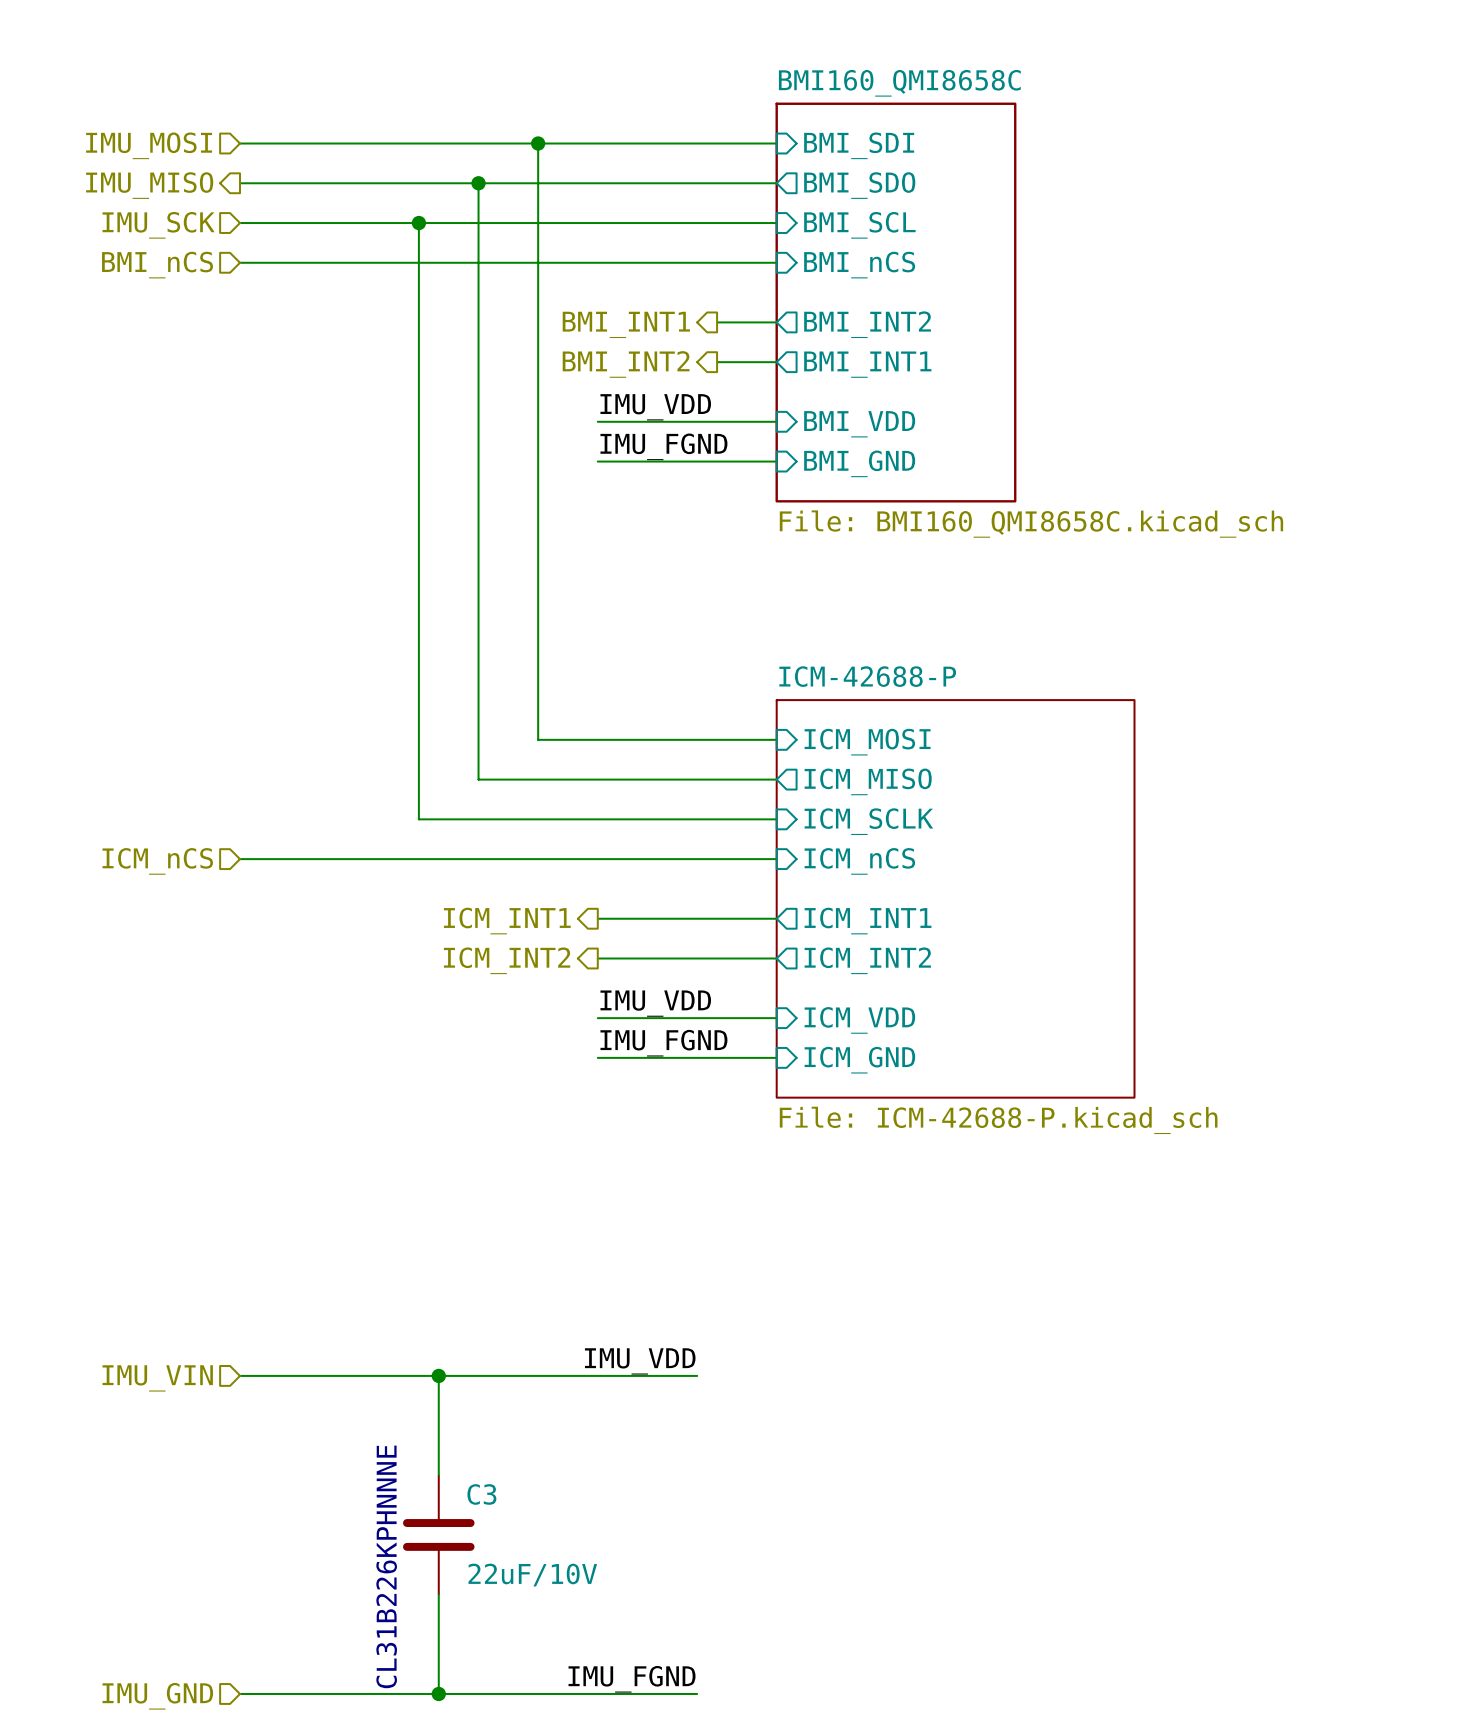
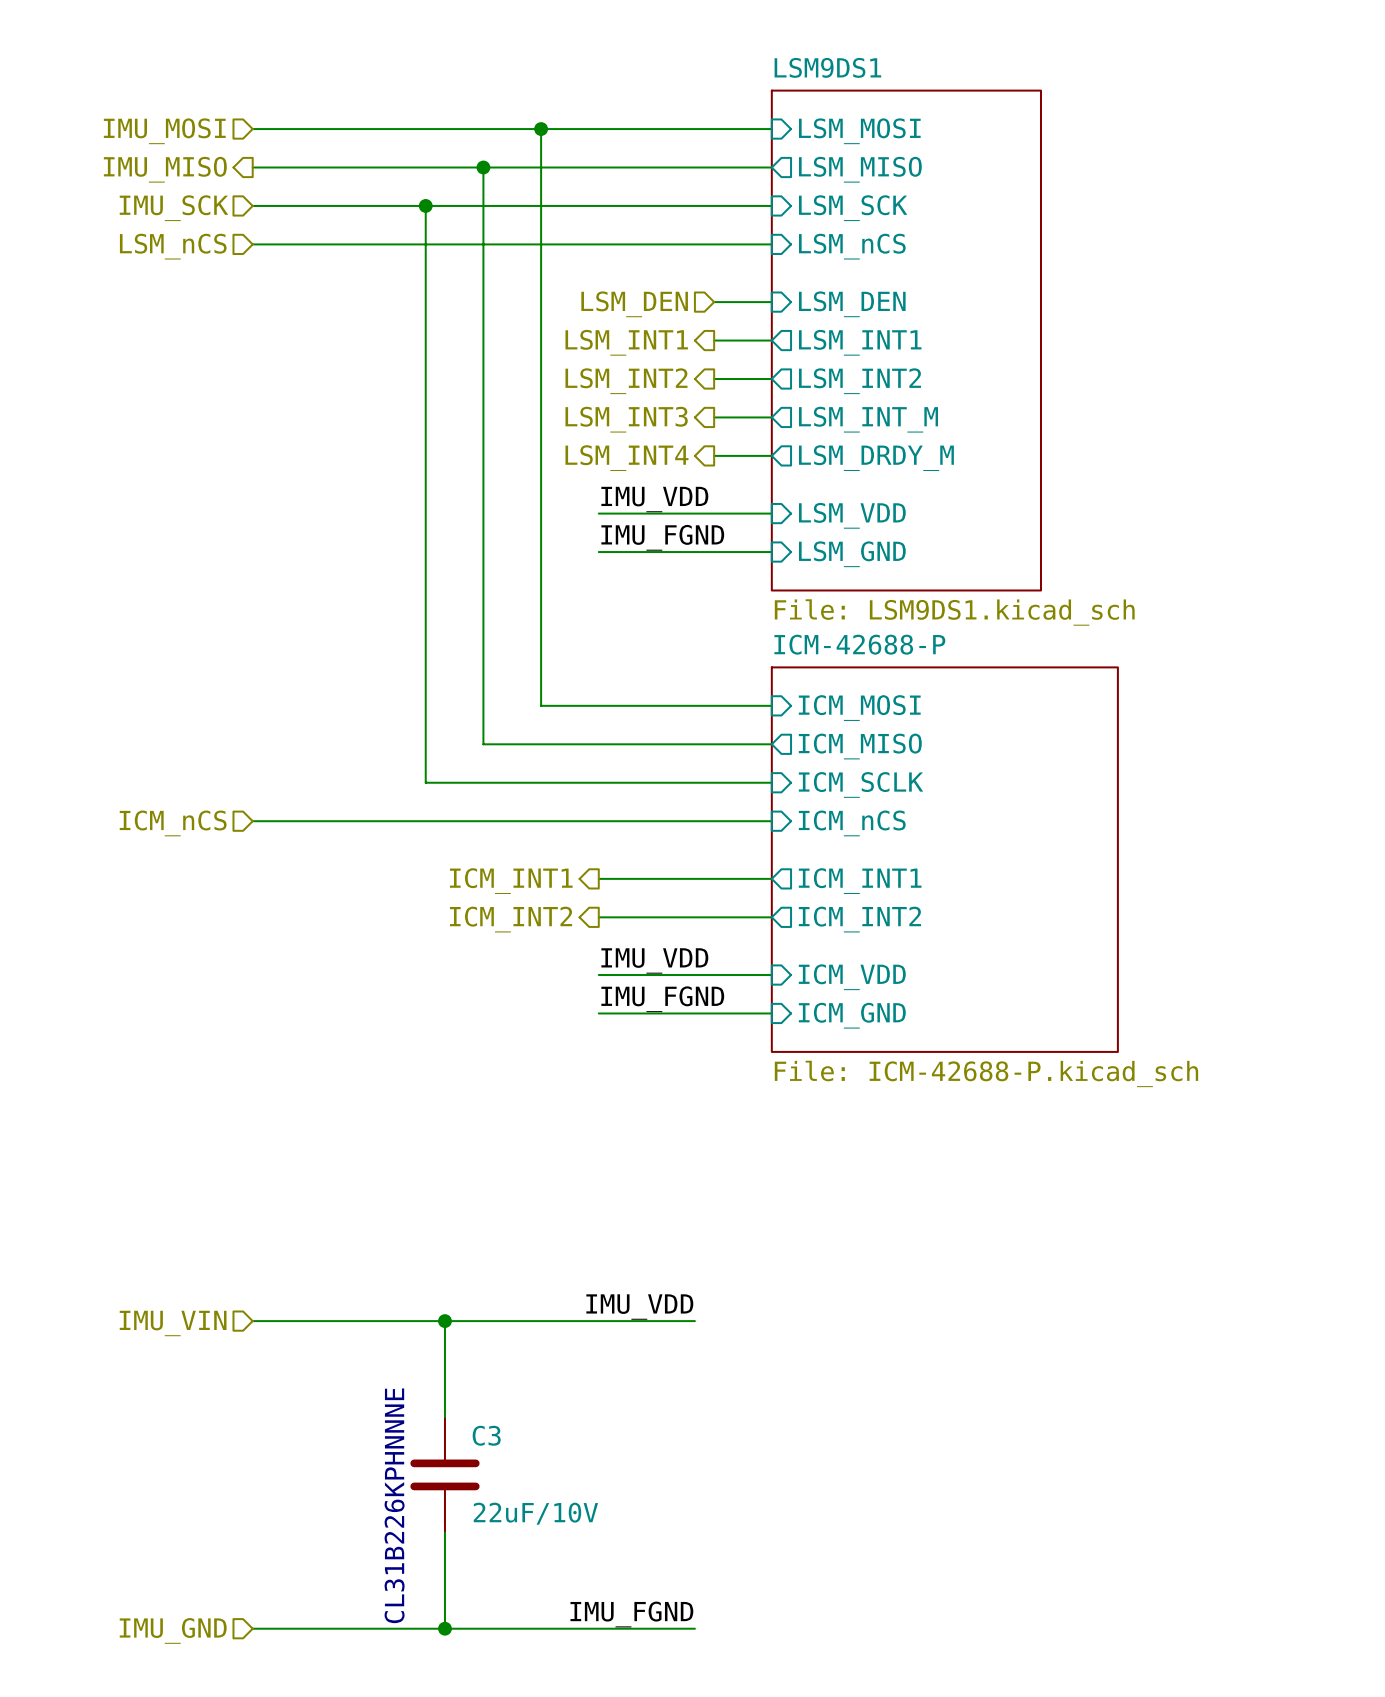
sheet pin: BMI_SDI (859, 145) -> LSM_MOSI (859, 131)
sheet pin: BMI_SDO (859, 185) -> LSM_MISO (860, 169)
sheet pin: BMI_SCL (859, 225) -> LSM_SCK (853, 208)
hierarchical label: BMI_nCS (157, 265) -> LSM_nCS (173, 246)
sheet pin: BMI_nCS (859, 265) -> LSM_nCS (852, 246)
sheet BMI160_QMI8658C: File: BMI160_QMI8658C.kicad_sch (895, 302) -> none
hierarchical label shape: output (626, 324) -> input (634, 304)
hierarchical label: BMI_INT1 (626, 324) -> LSM_DEN (634, 304)
sheet pin shape: output (867, 324) -> input (852, 304)
sheet pin: BMI_INT2 (867, 324) -> LSM_DEN (852, 304)
sheet LSM9DS1: none -> File: LSM9DS1.kicad_sch (906, 340)
hierarchical label: BMI_INT2 (626, 364) -> LSM_INT1 (626, 342)
sheet pin: BMI_INT1 (867, 364) -> LSM_INT1 (860, 342)
wire: none -> (714, 378) (771, 378)
hierarchical label: none -> LSM_INT2 (626, 381)
sheet pin: none -> LSM_INT2 (860, 381)
label position: IMU_VDD (655, 407) -> IMU_VDD (654, 499)
wire: (597, 421) (776, 421) -> (598, 513) (771, 513)
sheet pin: BMI_VDD (859, 424) -> none
wire: none -> (714, 417) (771, 417)
hierarchical label: none -> LSM_INT3 (626, 419)
sheet pin: none -> LSM_INT_M (868, 419)
label position: IMU_FGND (663, 446) -> IMU_FGND (662, 537)
wire: (597, 461) (776, 461) -> (598, 552) (771, 552)
sheet pin: BMI_GND (859, 463) -> none
wire: none -> (714, 455) (771, 455)
hierarchical label: none -> LSM_INT4 (626, 458)
sheet pin: none -> LSM_DRDY_M (876, 458)
sheet pin: none -> LSM_VDD (852, 515)
sheet pin: none -> LSM_GND (852, 554)

